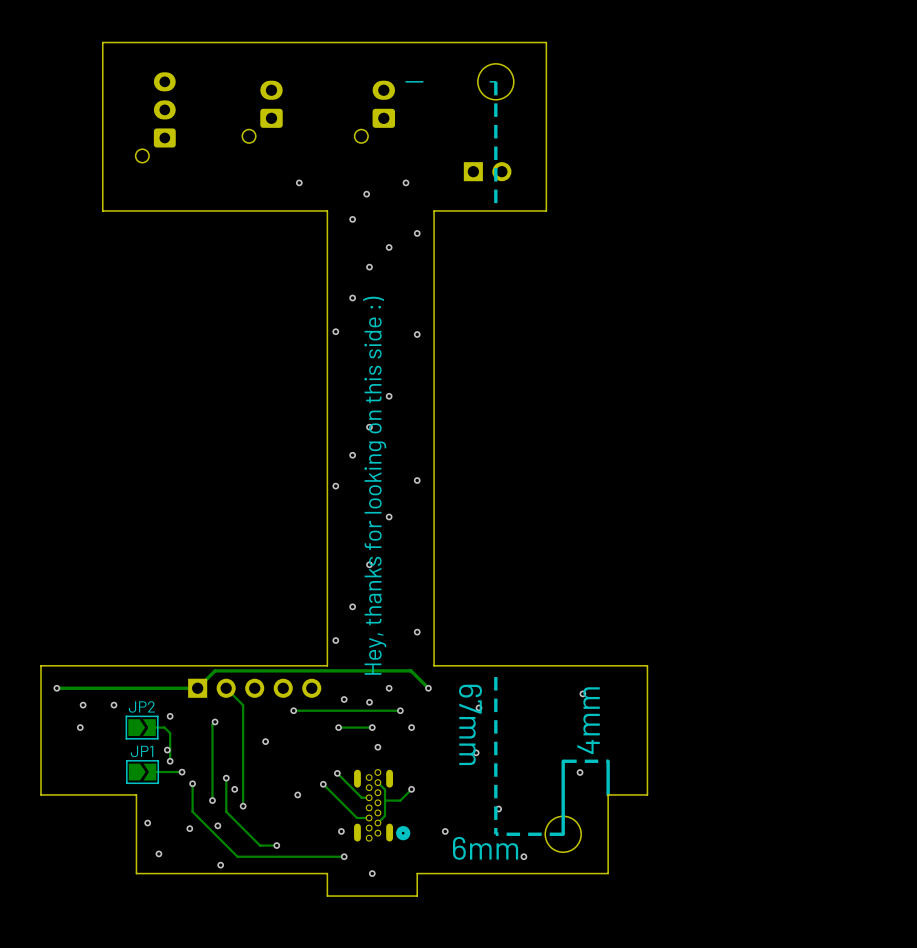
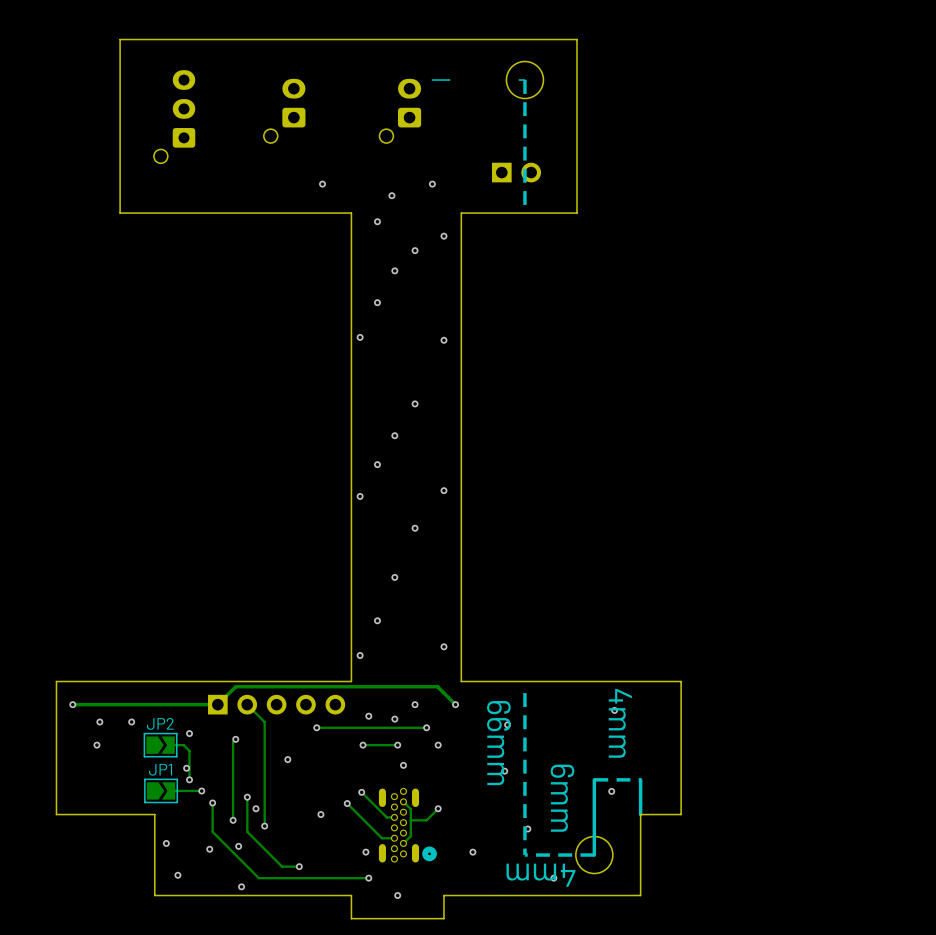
text: Hey, thanks for looking on this side :) (374, 485) -> none
text rotation: 0° (588, 720) -> 180° (620, 723)
text: 67mm (470, 724) -> 66mm (498, 743)
text rotation: 0° (485, 848) -> 90° clockwise (562, 798)
text: none -> 4mm (540, 875)

